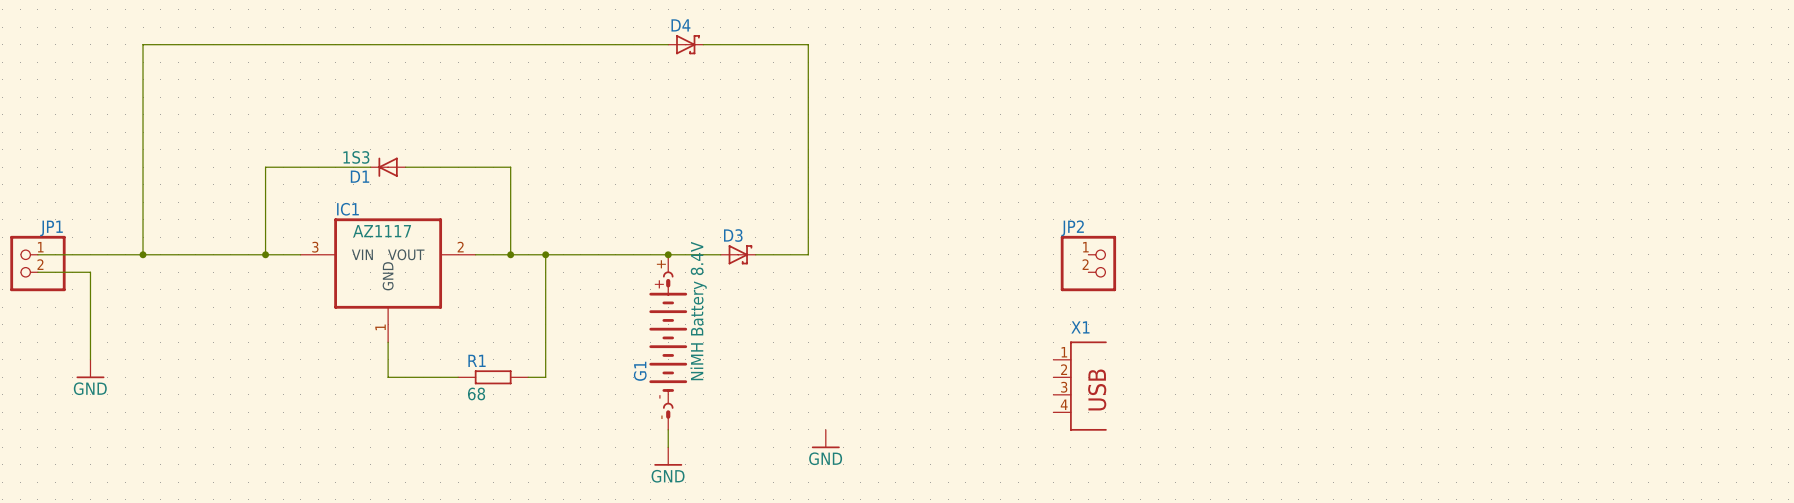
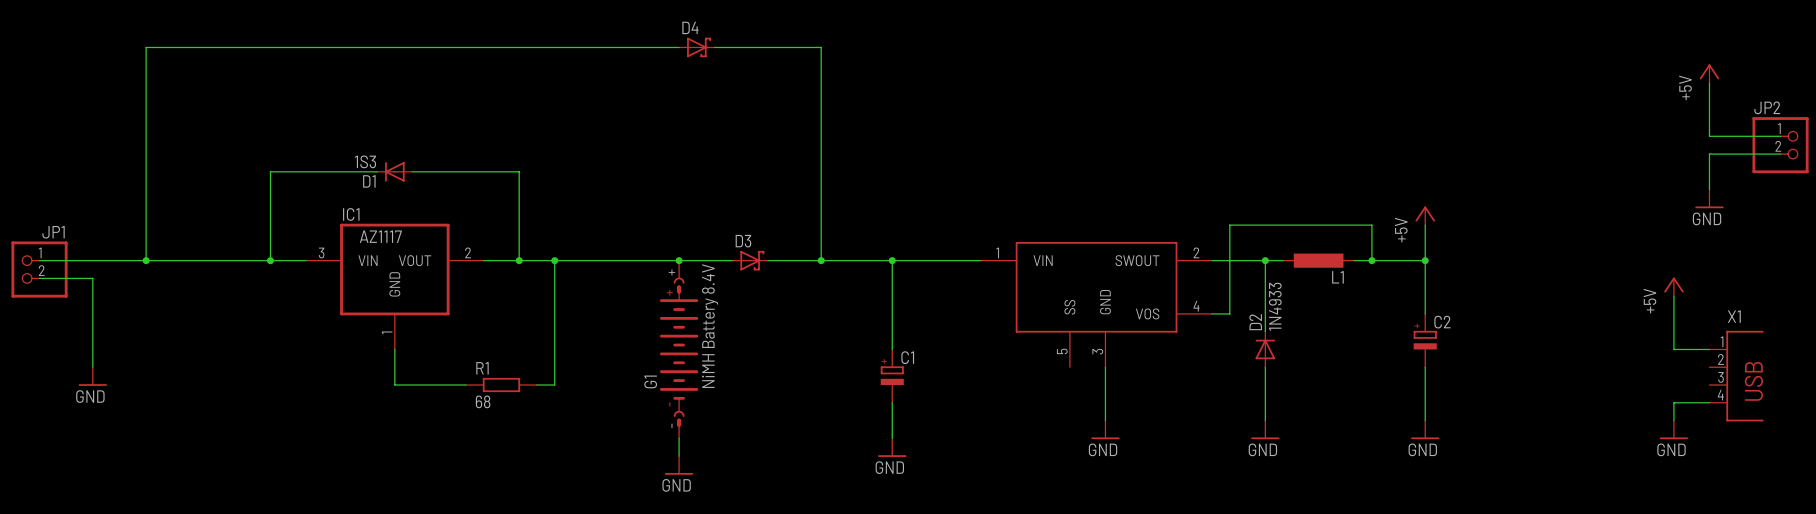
power symbol: none -> +5V (1709, 73)
wire: none -> (1709, 83) (1709, 136) (1780, 136)
wire: none -> (1780, 154) (1709, 154) (1709, 189)
power symbol: none -> GND (1709, 198)
power symbol: none -> +5V (1425, 215)
wire: none -> (1425, 225) (1425, 313)
wire: none -> (821, 260) (981, 260)
junction: none -> (821, 260)
wire: none -> (892, 260) (892, 349)
junction: none -> (892, 260)
wire: none -> (1212, 260) (1283, 260)
wire: none -> (1265, 260) (1265, 331)
junction: none -> (1265, 260)
L1: none -> (1318, 260)
wire: none -> (1354, 260) (1425, 260)
wire: none -> (1371, 260) (1371, 225) (1229, 225) (1229, 313) (1212, 313)
junction: none -> (1371, 260)
junction: none -> (1425, 260)
JP2 position: (1088, 263) -> (1780, 145)
power symbol: none -> +5V (1673, 286)
wire: none -> (1673, 296) (1673, 349) (1709, 349)
part: none -> (1096, 304)
C2: none -> (1425, 340)
D2: none -> 1N4933 (1265, 349)
wire: none -> (1105, 367) (1105, 420)
wire: none -> (1265, 367) (1265, 420)
wire: none -> (1425, 367) (1425, 420)
C1: none -> (892, 376)
X1 position: (1080, 386) -> (1736, 376)
wire: none -> (892, 402) (892, 438)
wire: none -> (1709, 402) (1673, 402) (1673, 420)
power symbol: none -> GND (1105, 429)
power symbol: none -> GND (1265, 429)
power symbol: none -> GND (1425, 429)
power symbol: none -> GND (1673, 429)
power symbol position: GND (825, 439) -> GND (892, 447)

